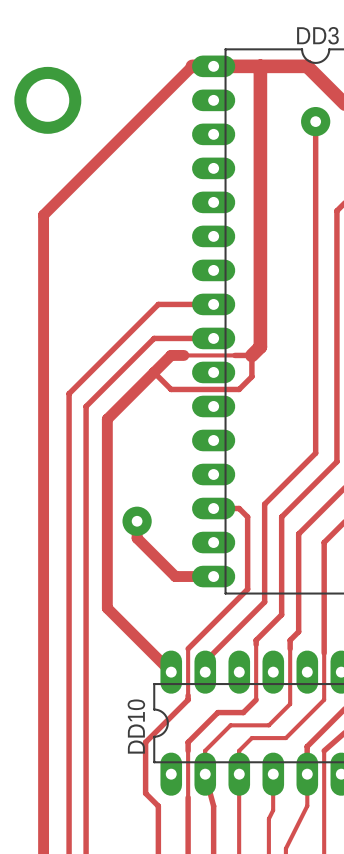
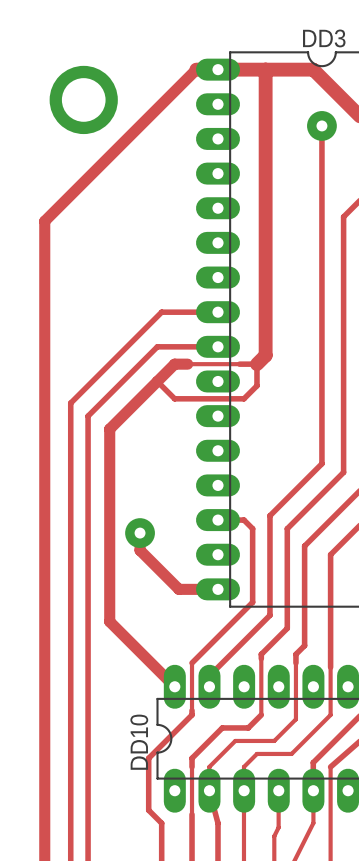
via position: (47, 100) -> (83, 99)

